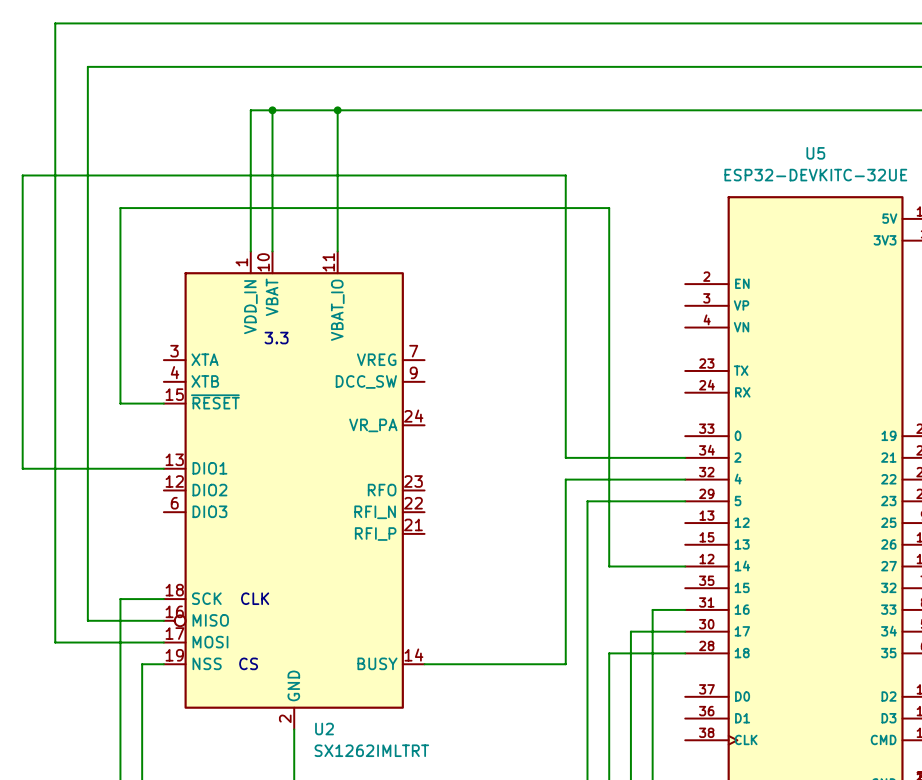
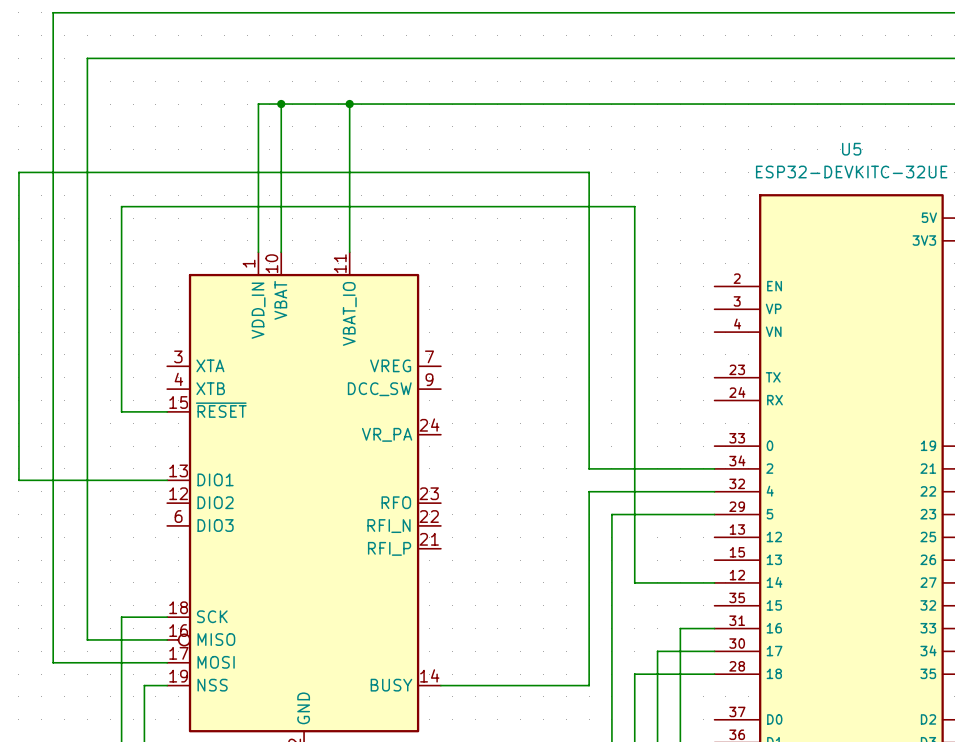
text: 3.3 (276, 338) -> none
text: CLK (255, 598) -> none
text: CS (248, 663) -> none

